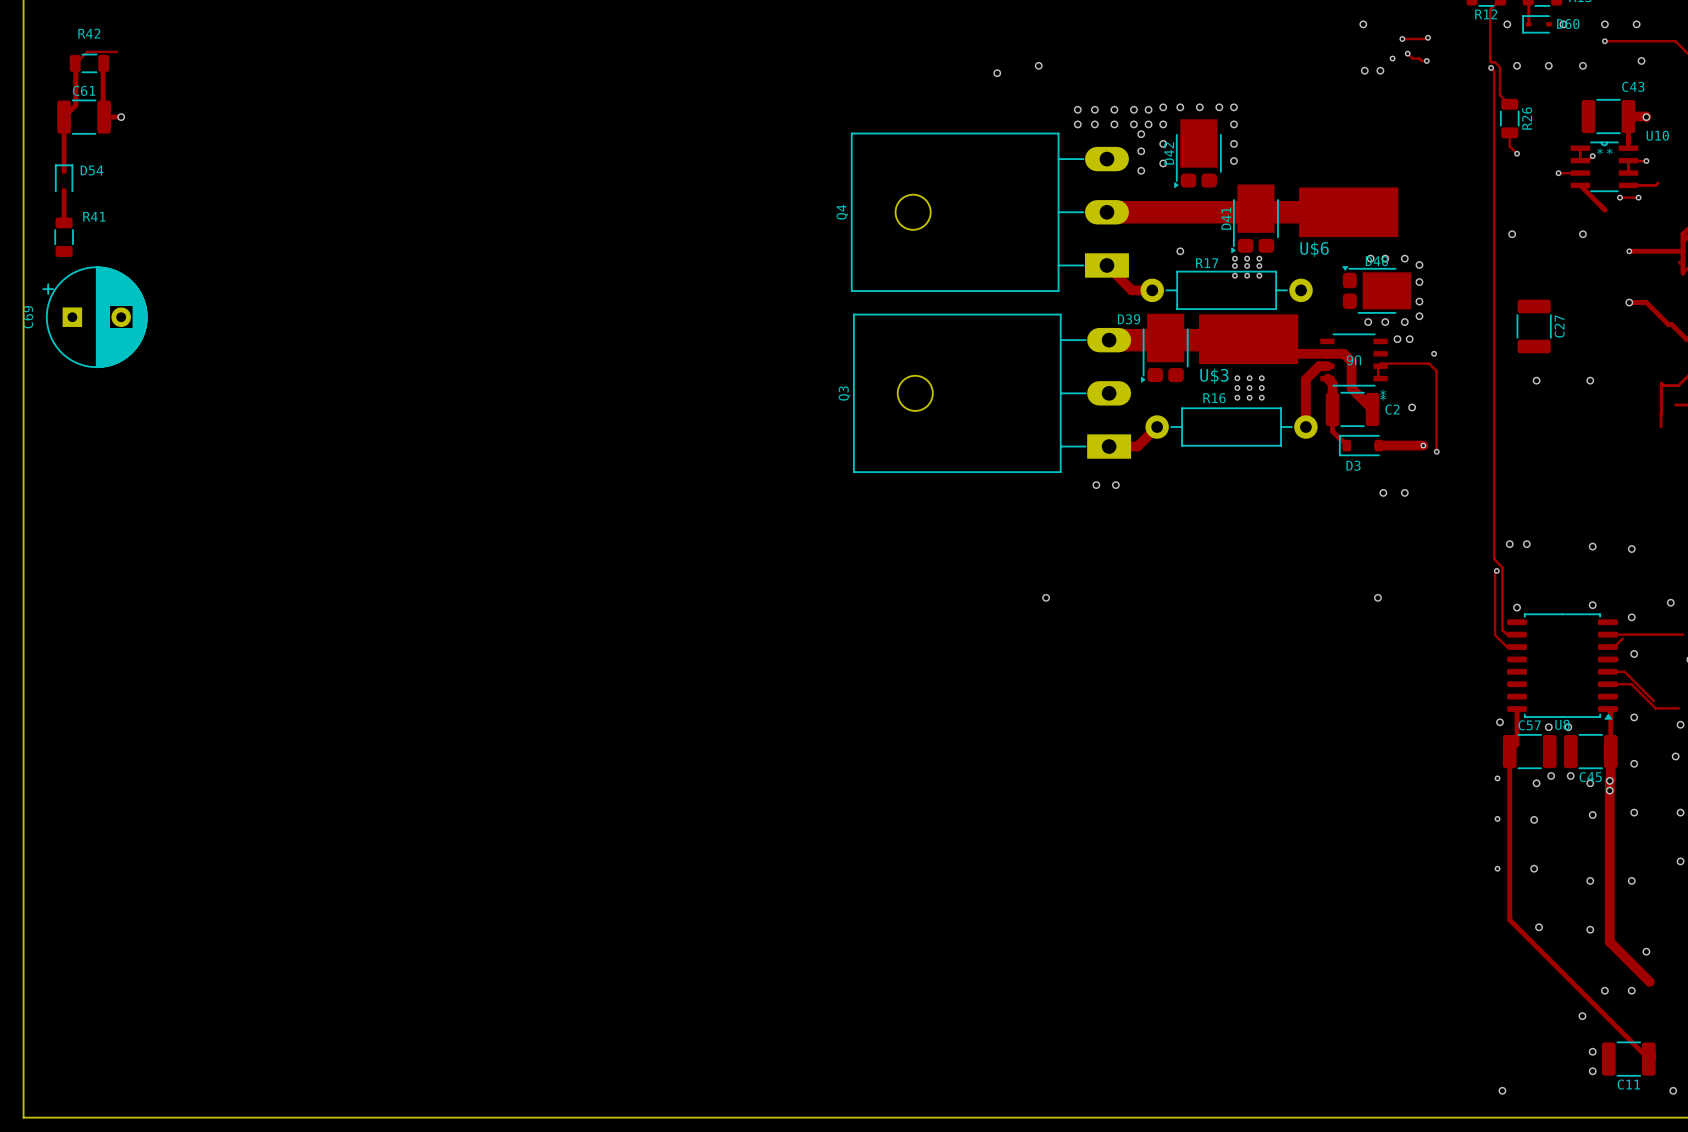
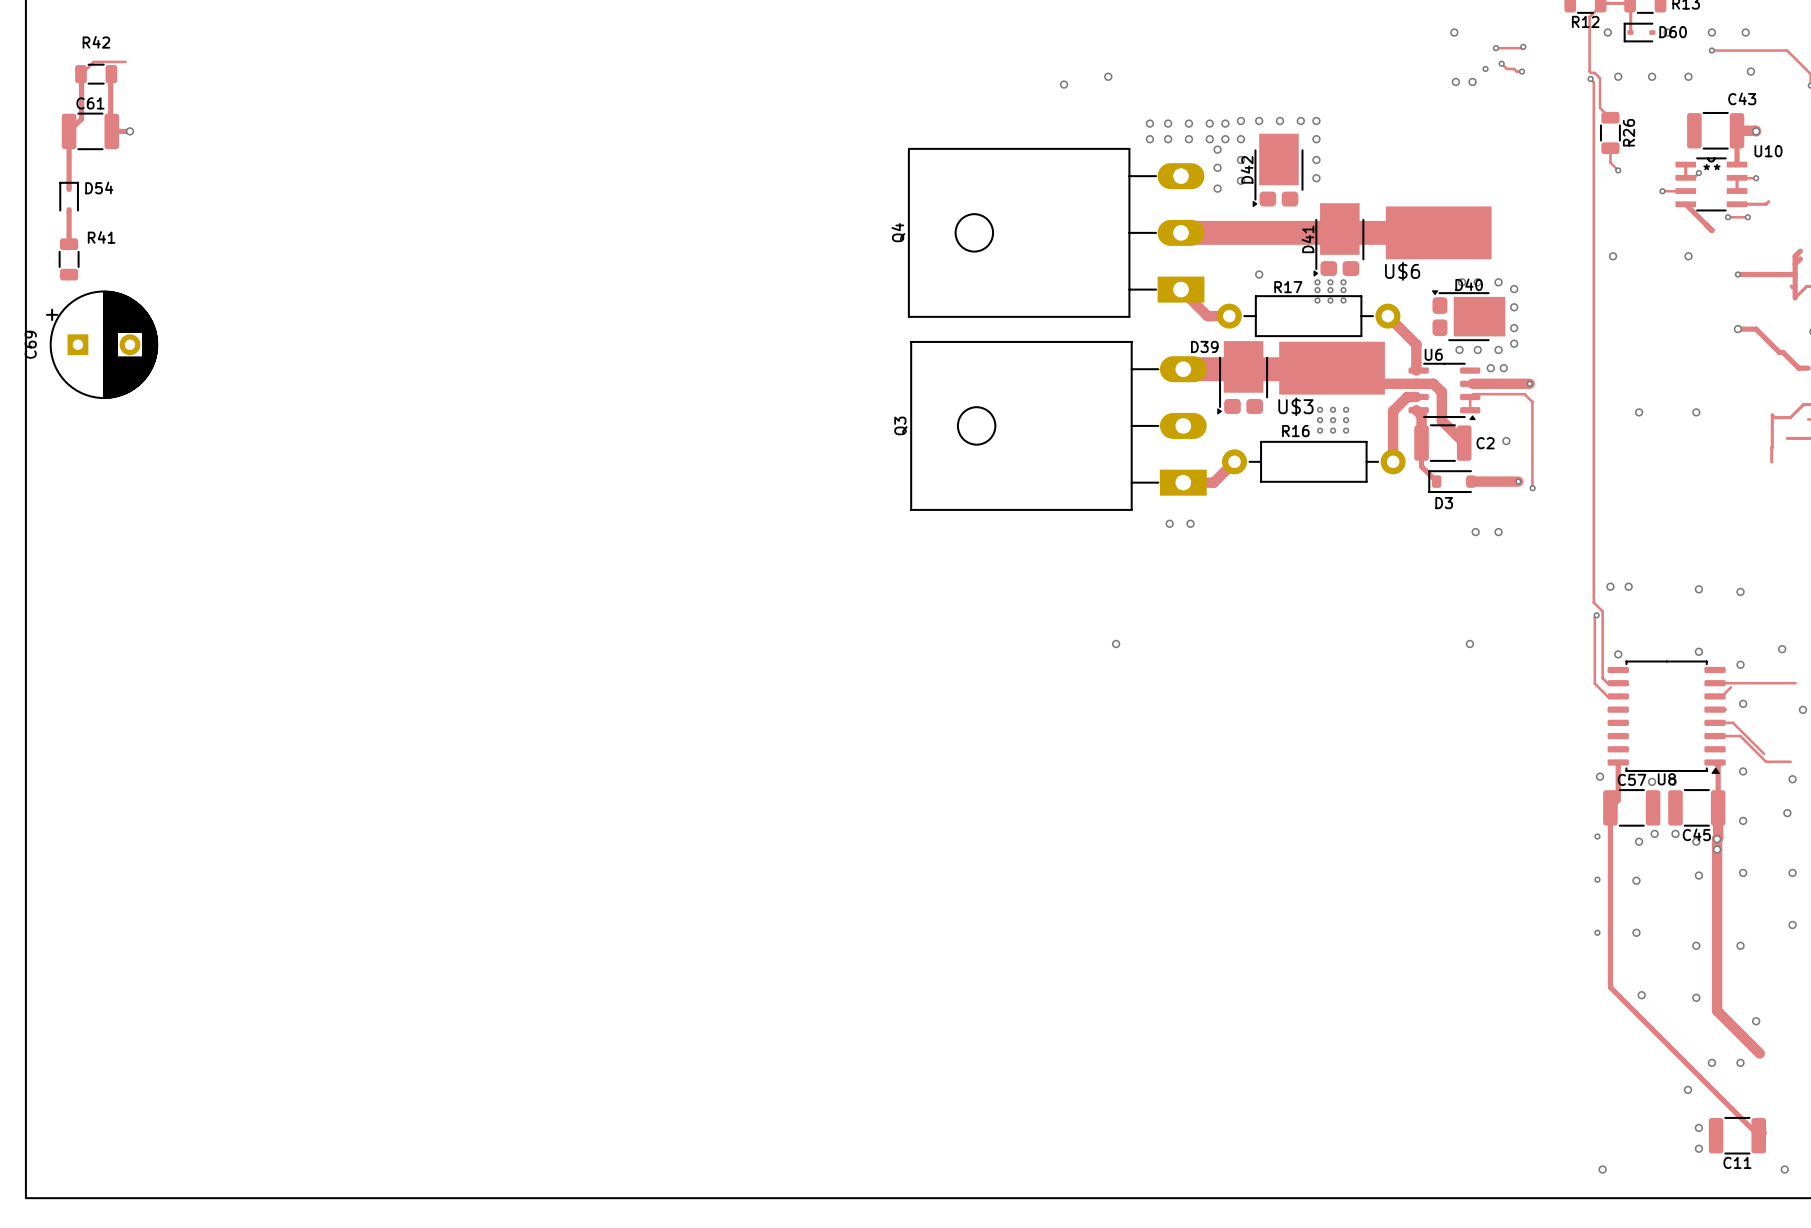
track: none -> (1387, 316) (1416, 344) (1416, 370)
C27: (1534, 326) -> none
U6 footprint: [1320, 333, 1388, 387] -> [1408, 363, 1481, 421]
track: none -> (1472, 383) (1529, 383)
U6 name position: U6 (1353, 360) -> U6 (1433, 354)

